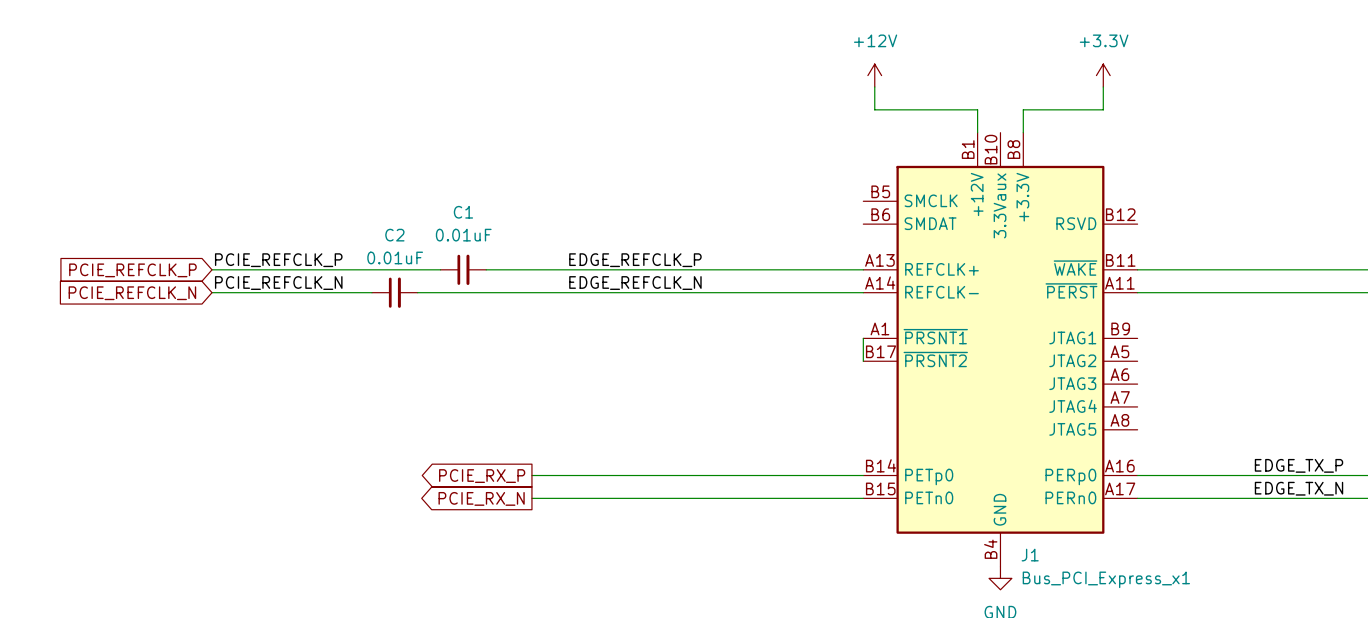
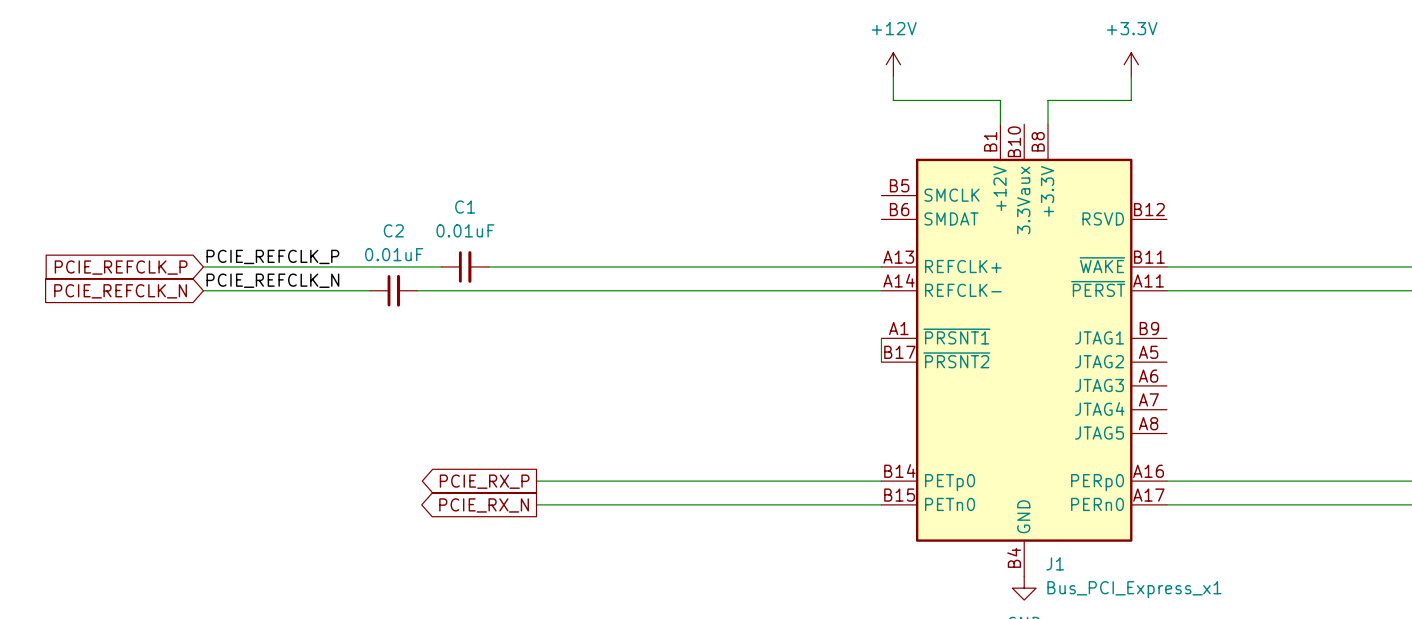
label: EDGE_REFCLK_P (635, 260) -> none
label: EDGE_REFCLK_N (635, 283) -> none
label: EDGE_TX_P (1299, 465) -> none
label: EDGE_TX_N (1299, 488) -> none

